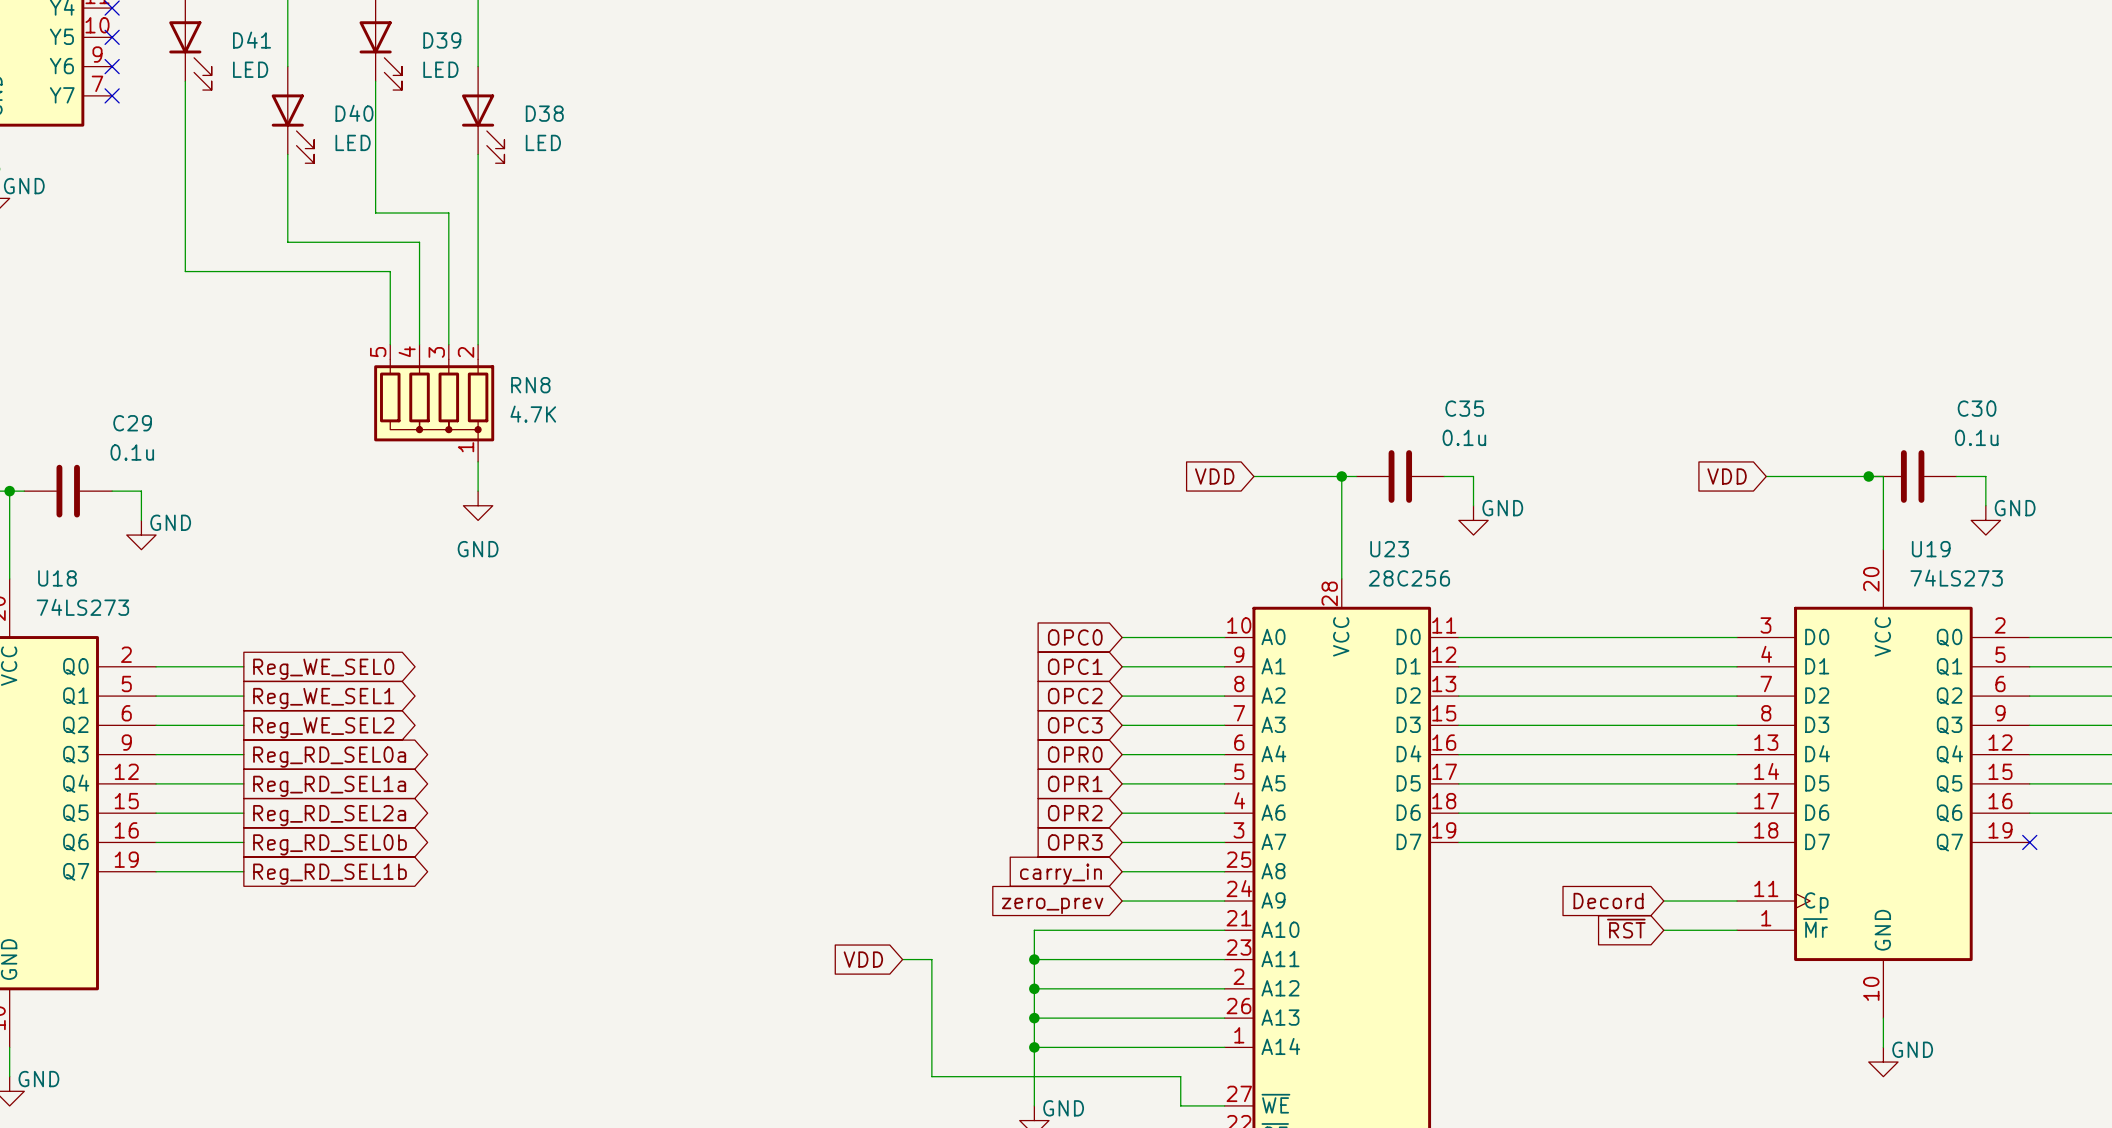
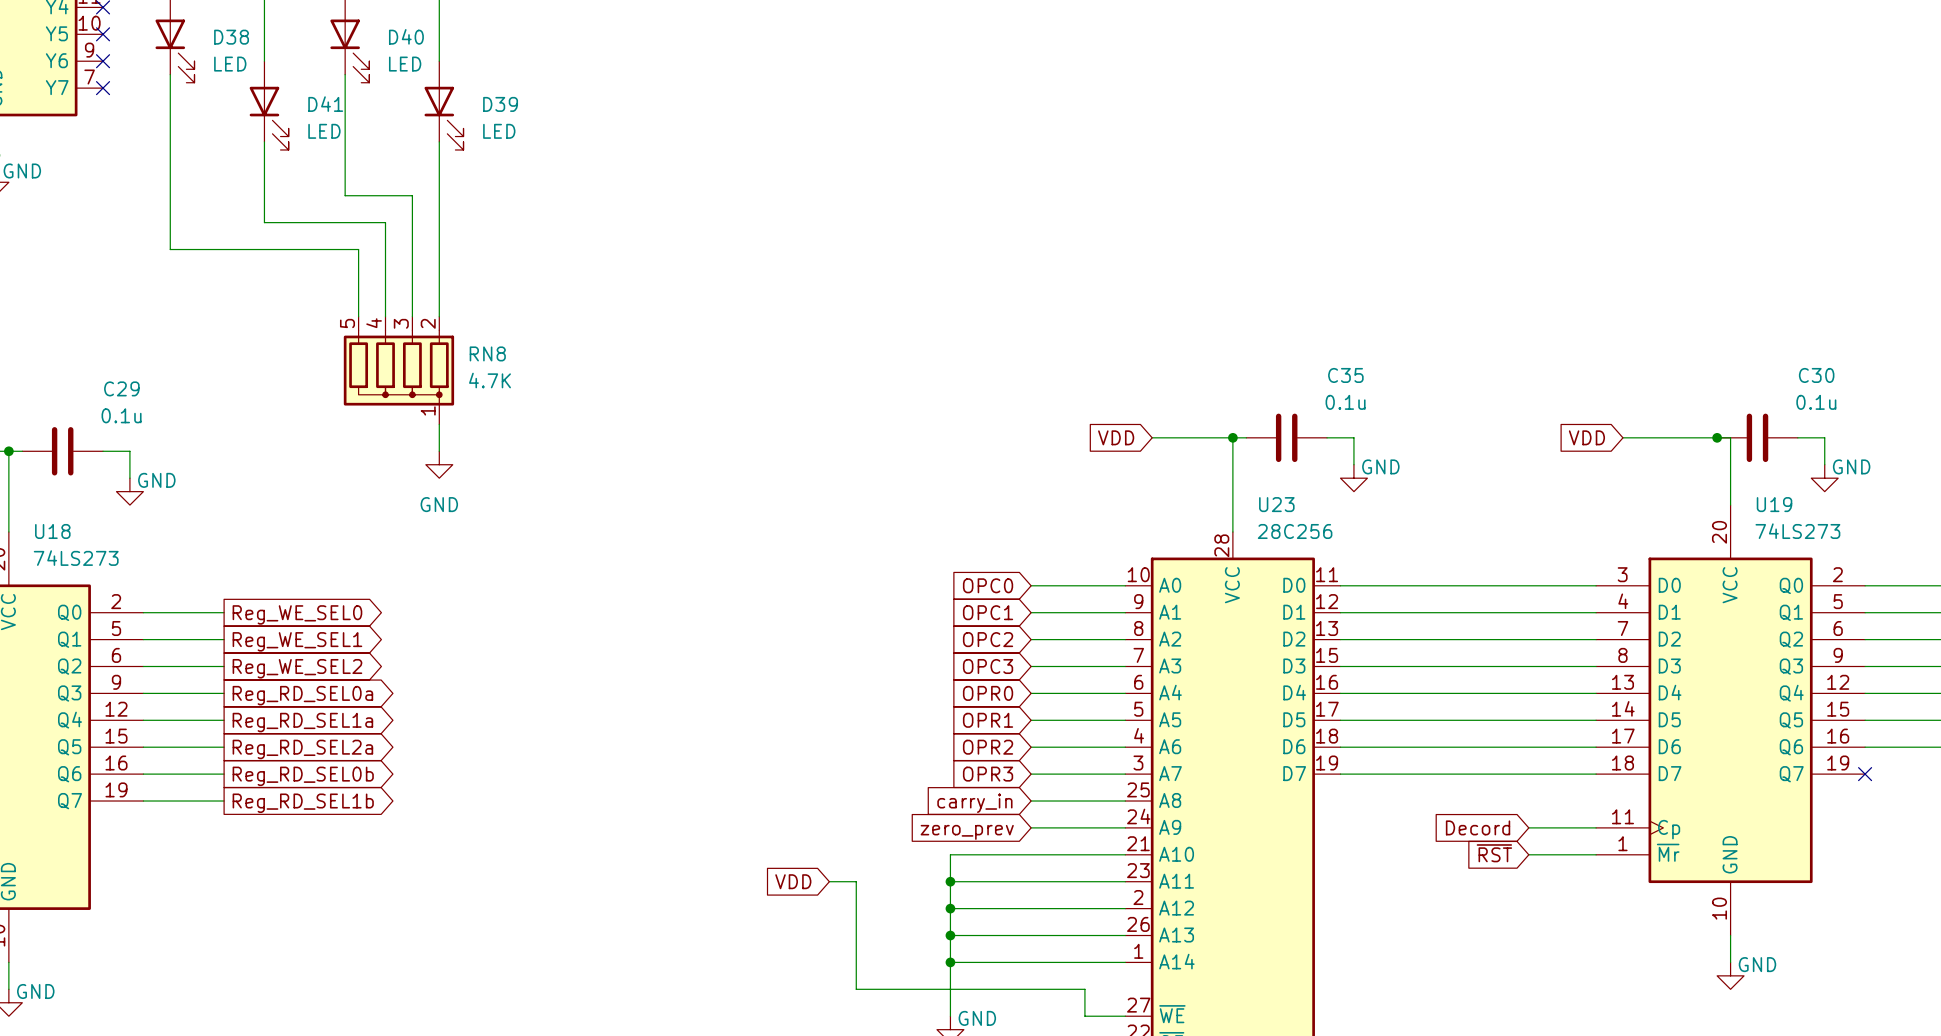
D41 name: D41 (252, 40) -> D38 (231, 37)
D39 name: D39 (442, 40) -> D40 (406, 36)
D40 name: D40 (354, 113) -> D41 (325, 104)
D38 name: D38 (544, 113) -> D39 (500, 104)

